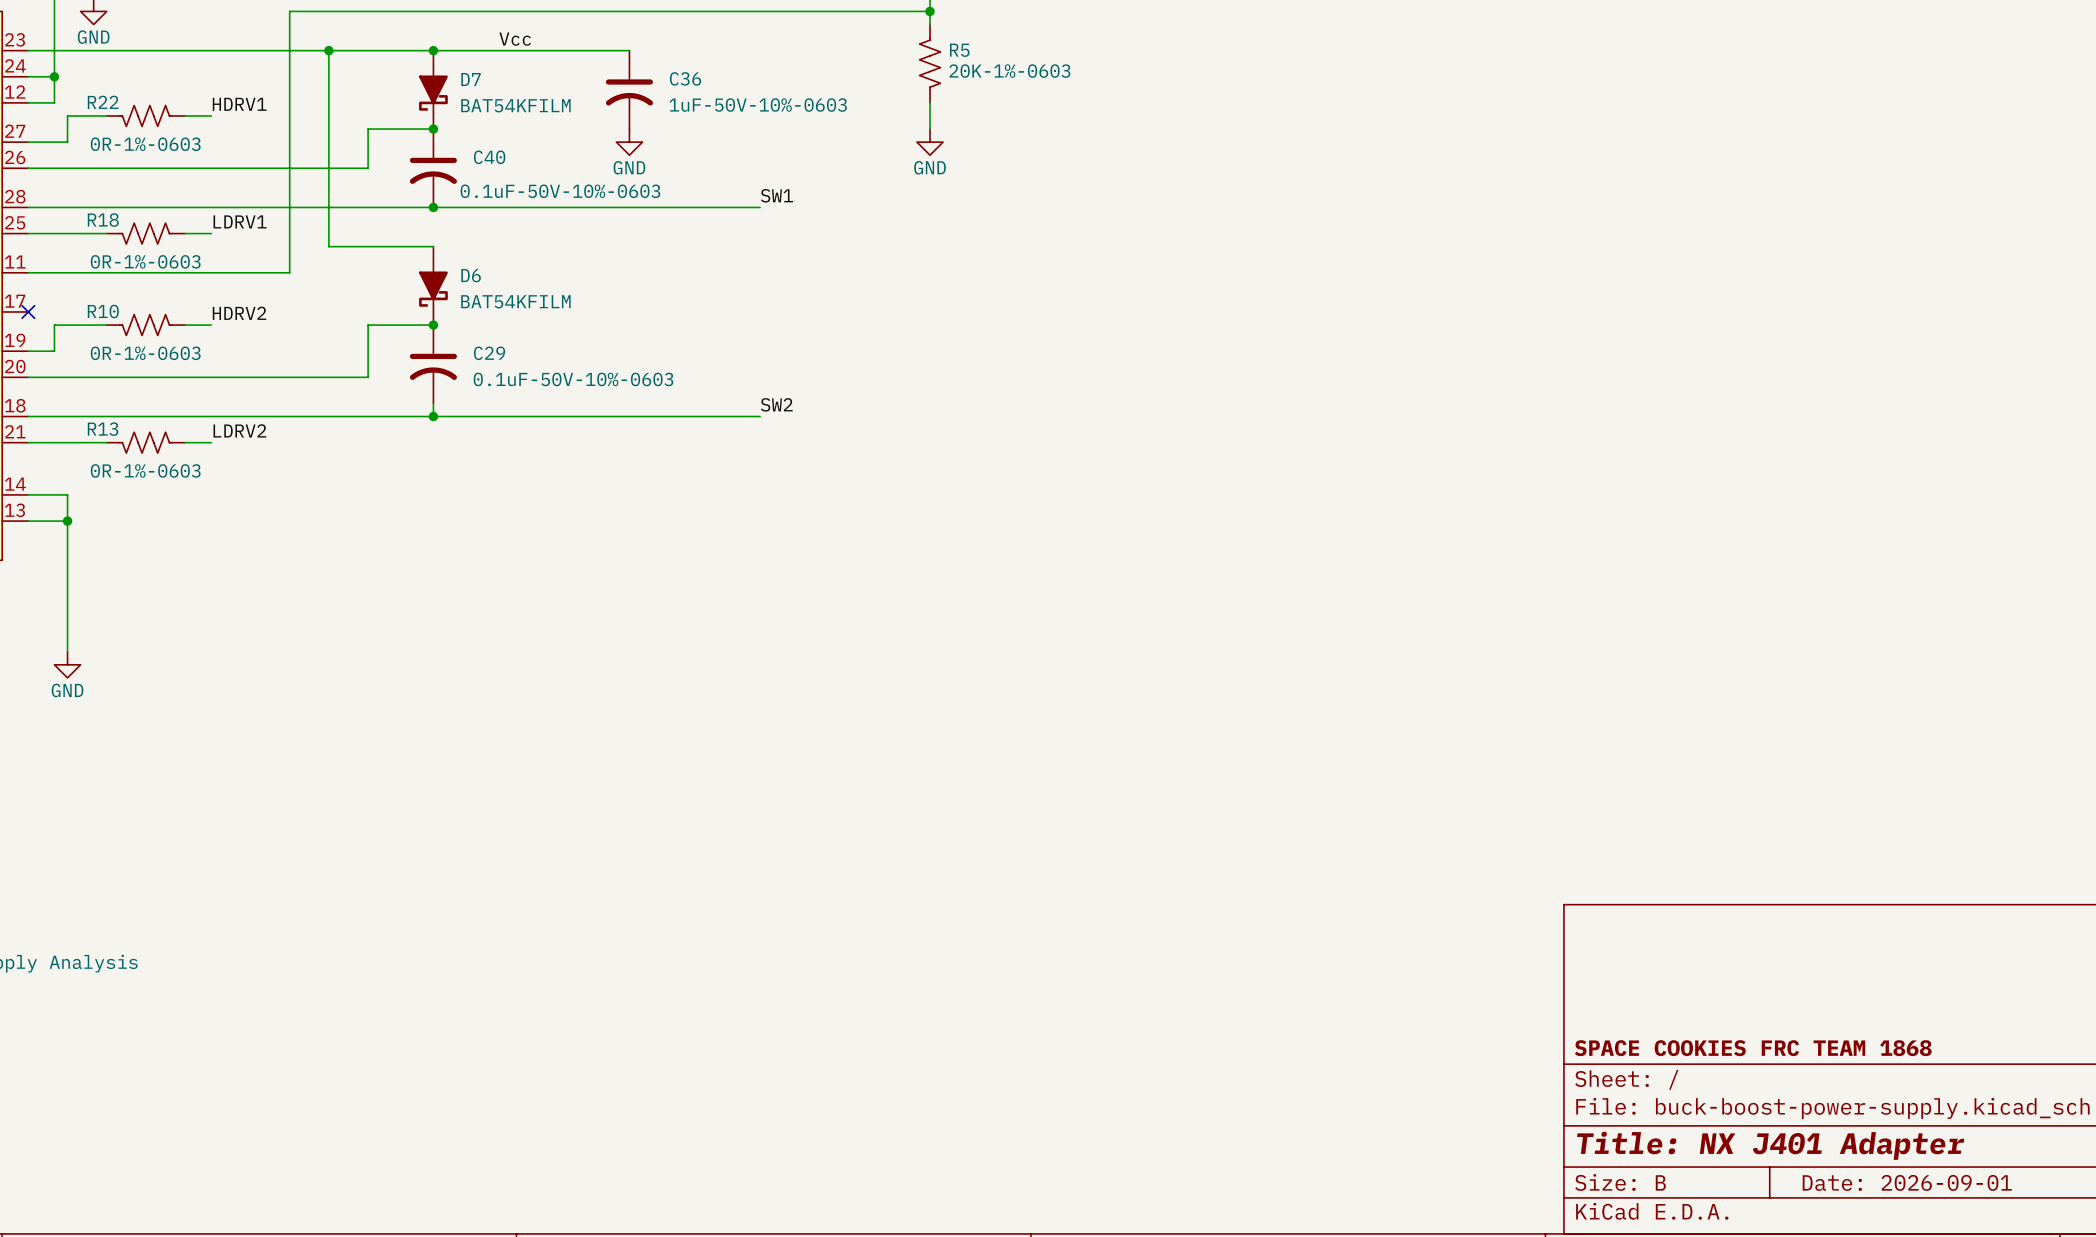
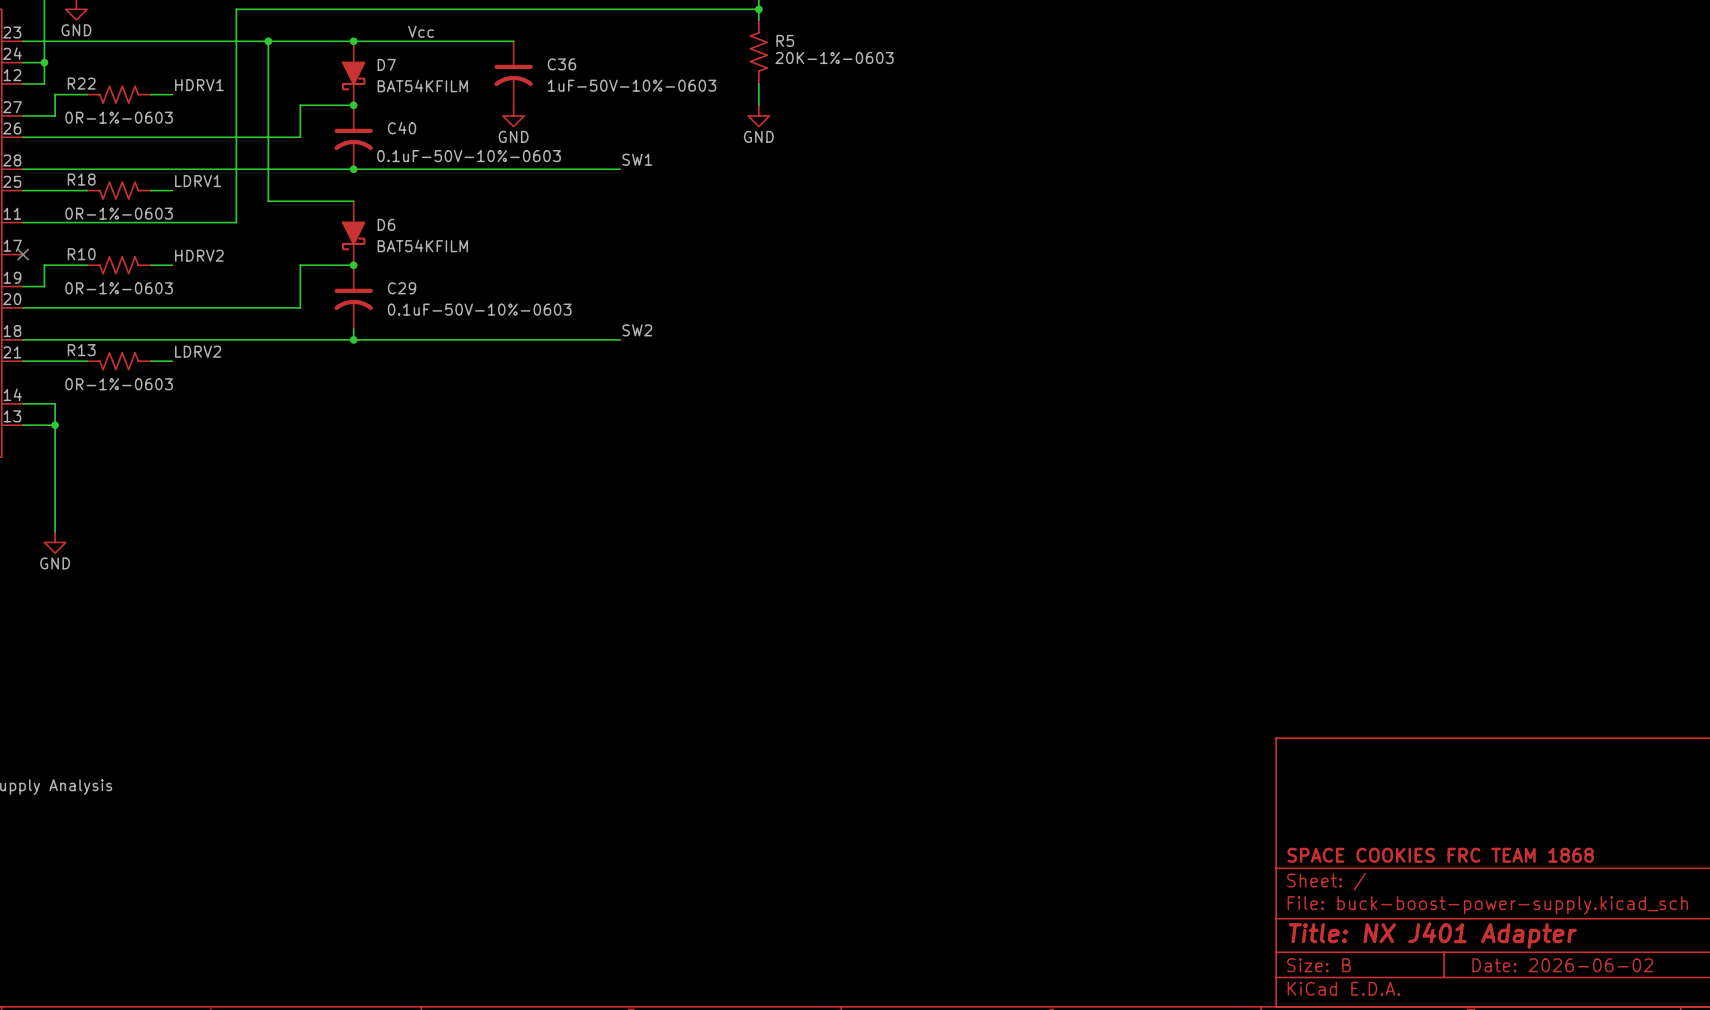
title block: Date: 2026-09-01 (1907, 1182) -> Date: 2026-06-02 (1562, 965)

